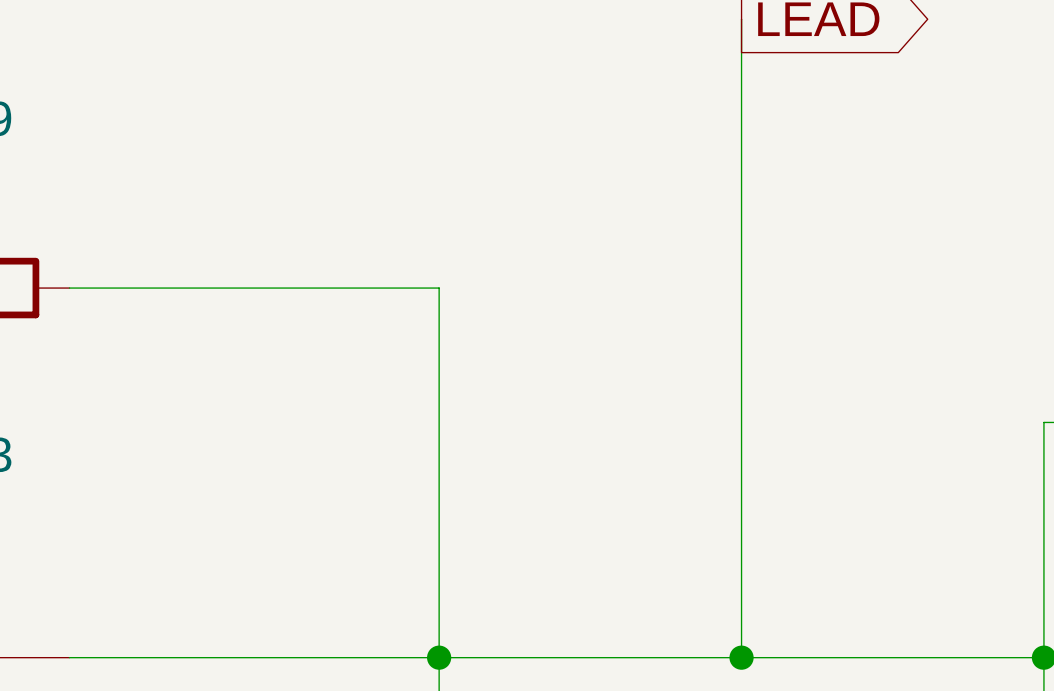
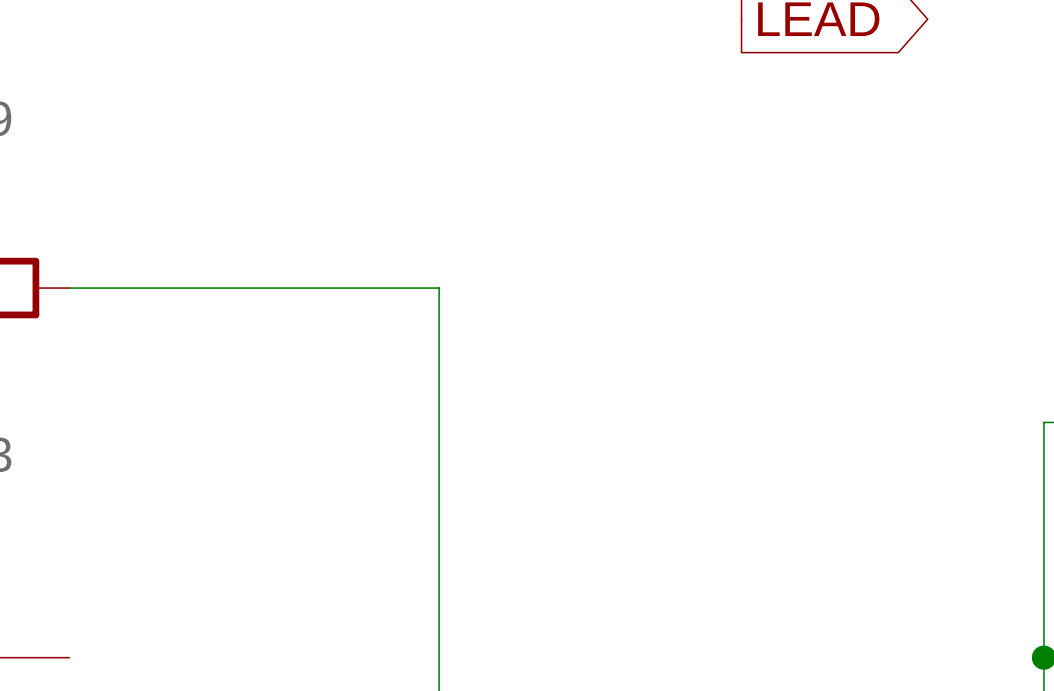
wire: (741, 19) (741, 657) -> none
wire: (69, 657) (1043, 657) -> none
junction: (439, 657) -> none
junction: (741, 657) -> none

